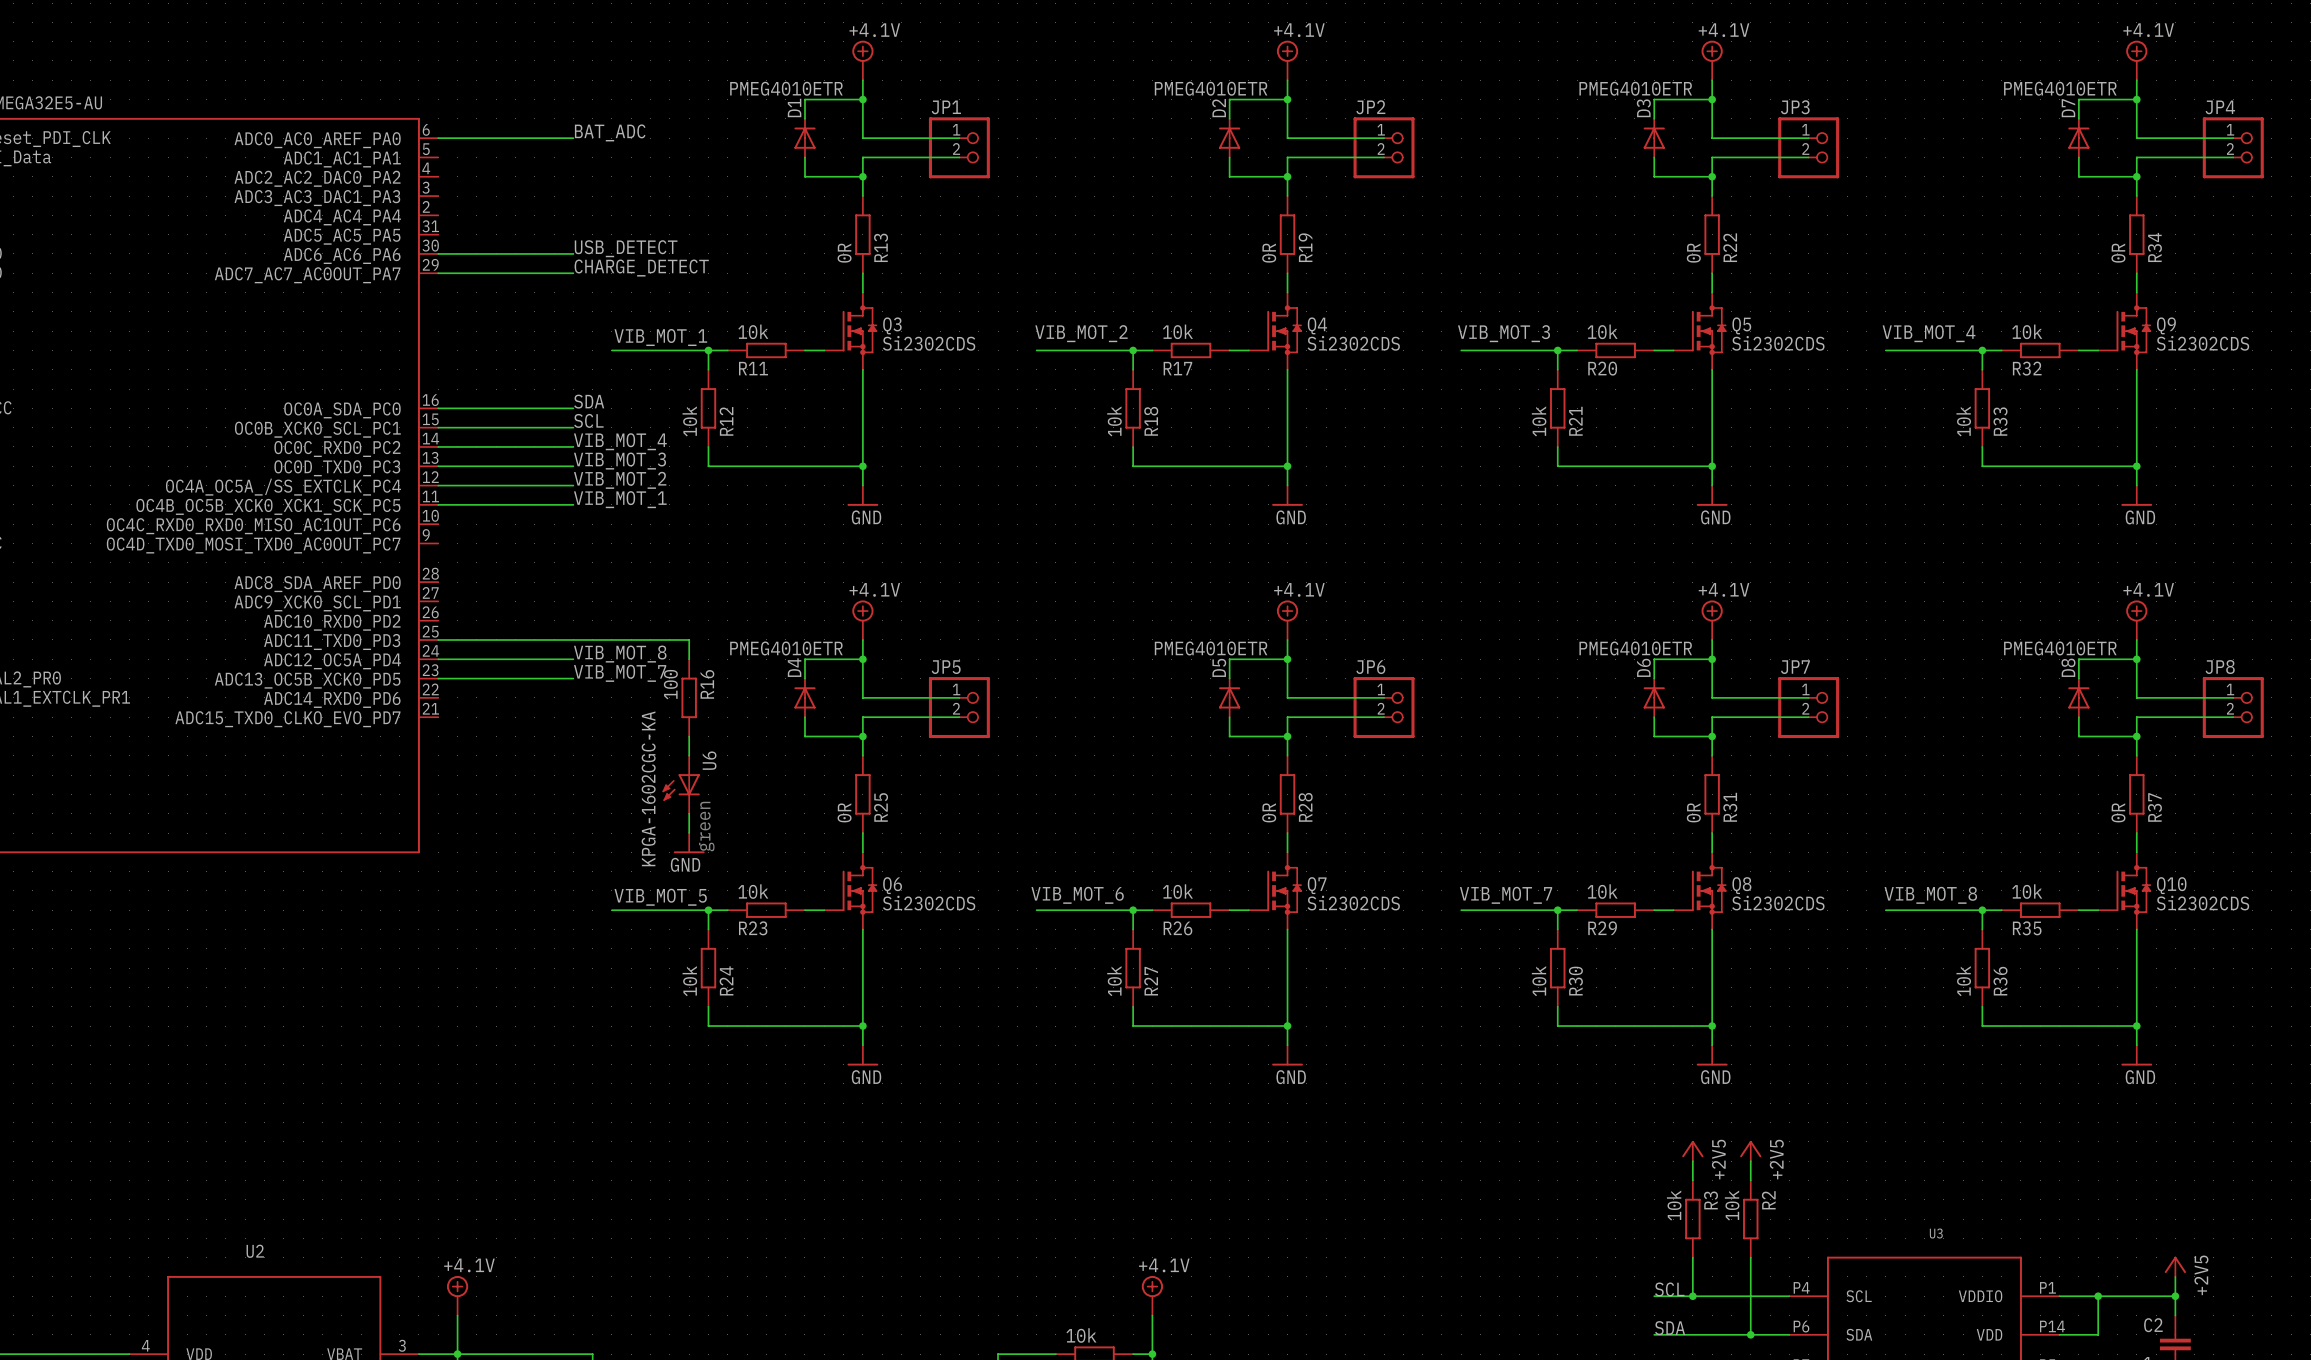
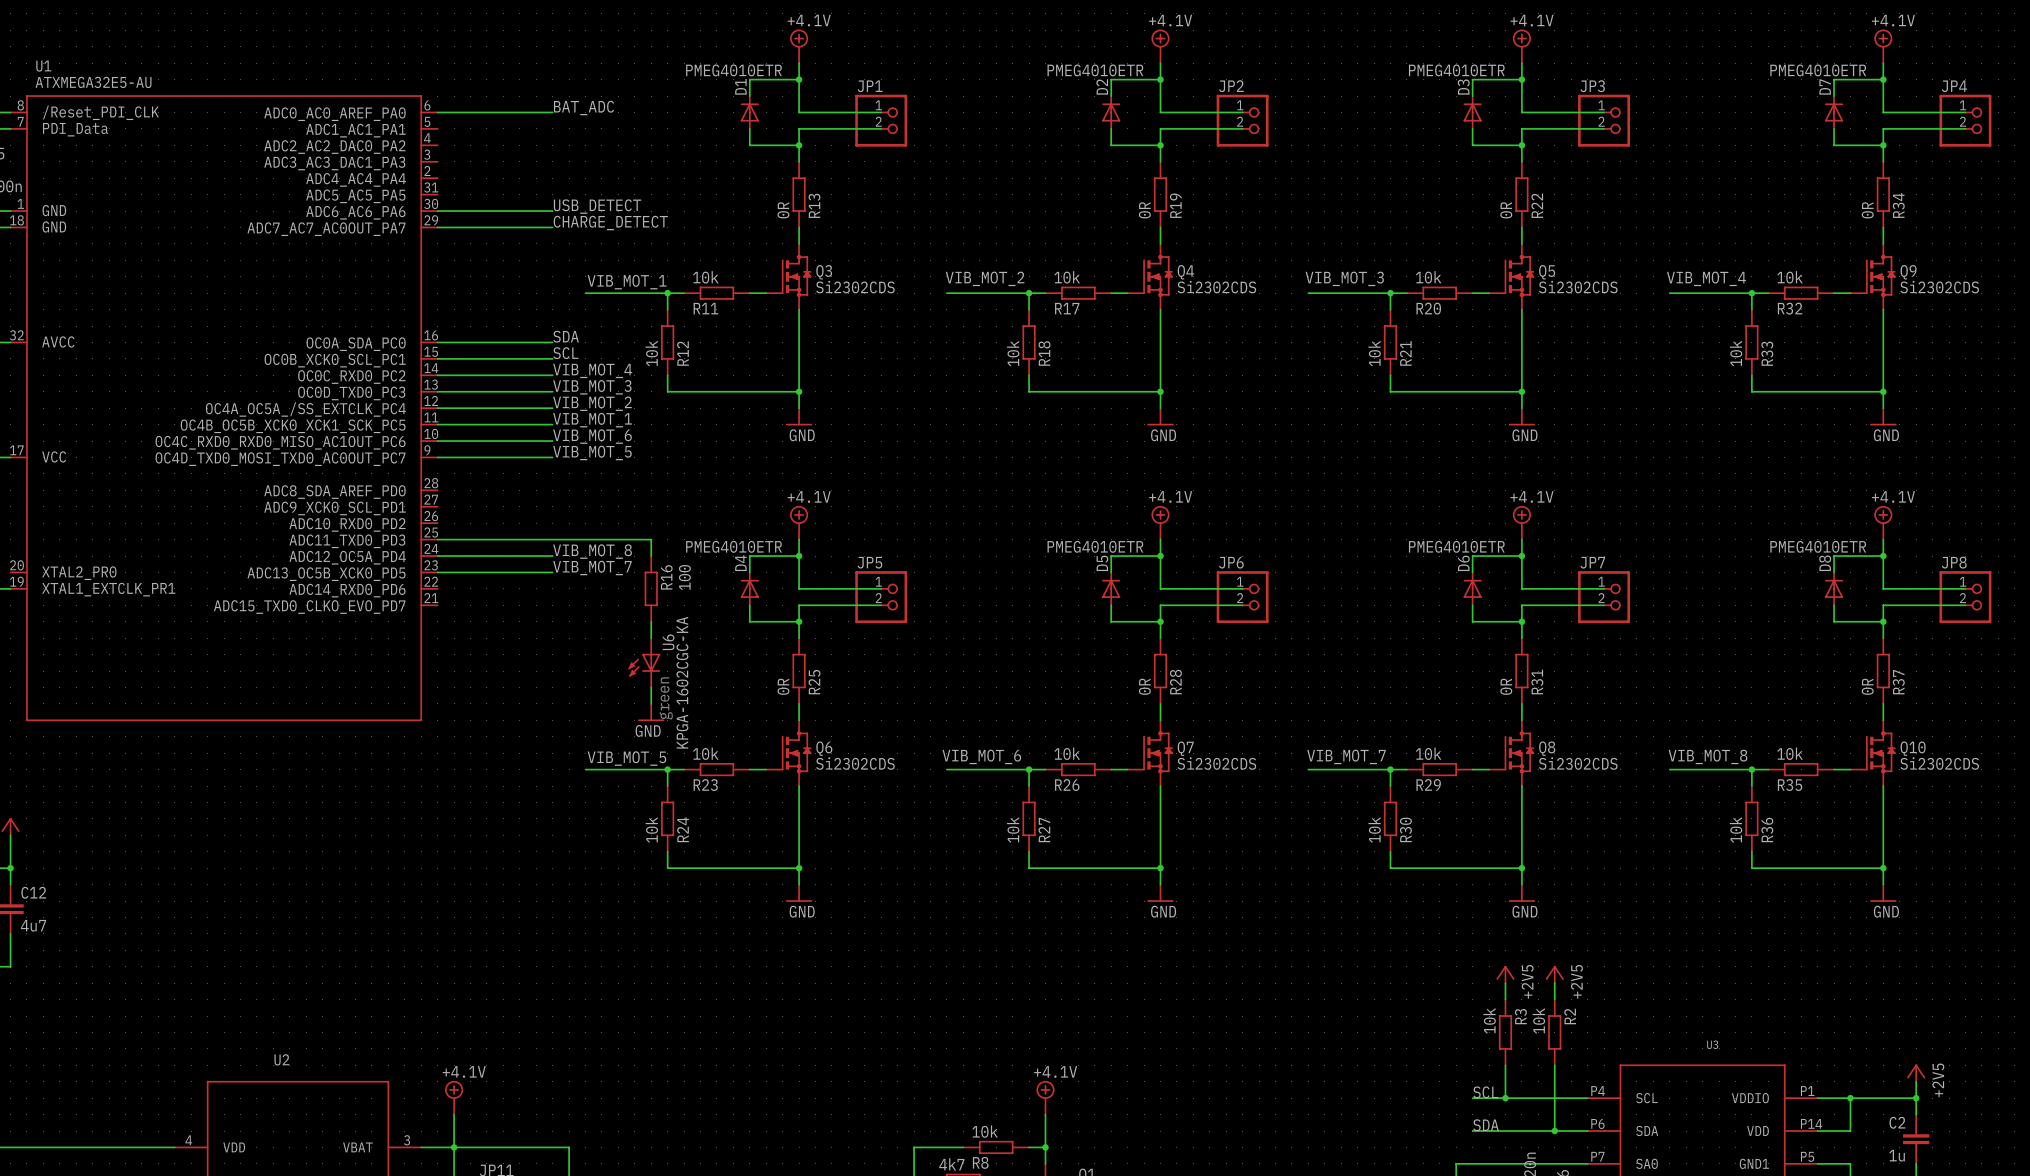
label: none -> VIB_MOT_6 (592, 436)
wire: none -> (437, 441) (552, 441)
label: none -> VIB_MOT_5 (592, 453)
wire: none -> (437, 457) (552, 457)
R16 value position: 100 (670, 684) -> 100 (684, 577)
U6 value position: KPGA-1602CGC-KA (648, 788) -> KPGA-1602CGC-KA (682, 682)

